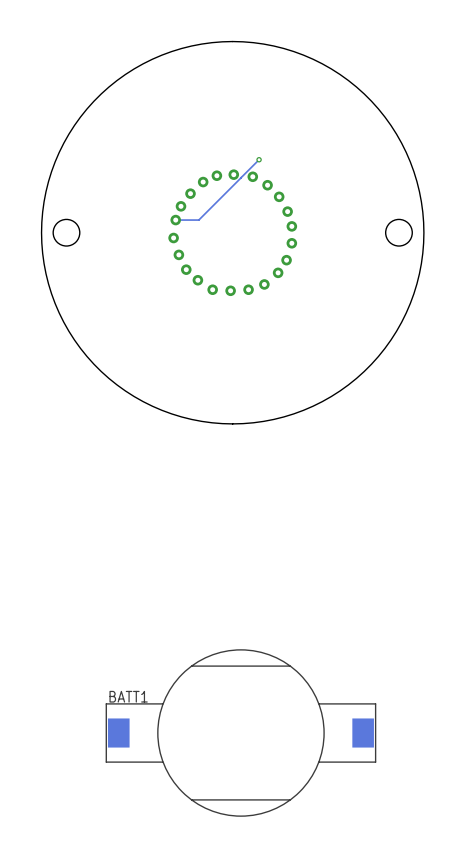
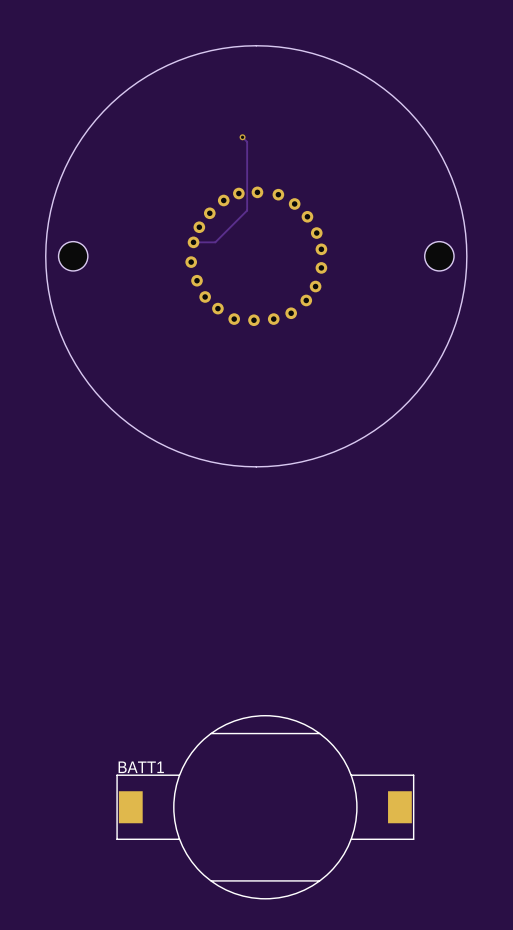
via: none -> (242, 137)
track: (259, 159) (241, 177) -> none
via: (259, 159) -> none
track: (241, 177) (198, 220) (195, 220) -> (242, 137) (247, 141) (247, 210) (215, 242)

